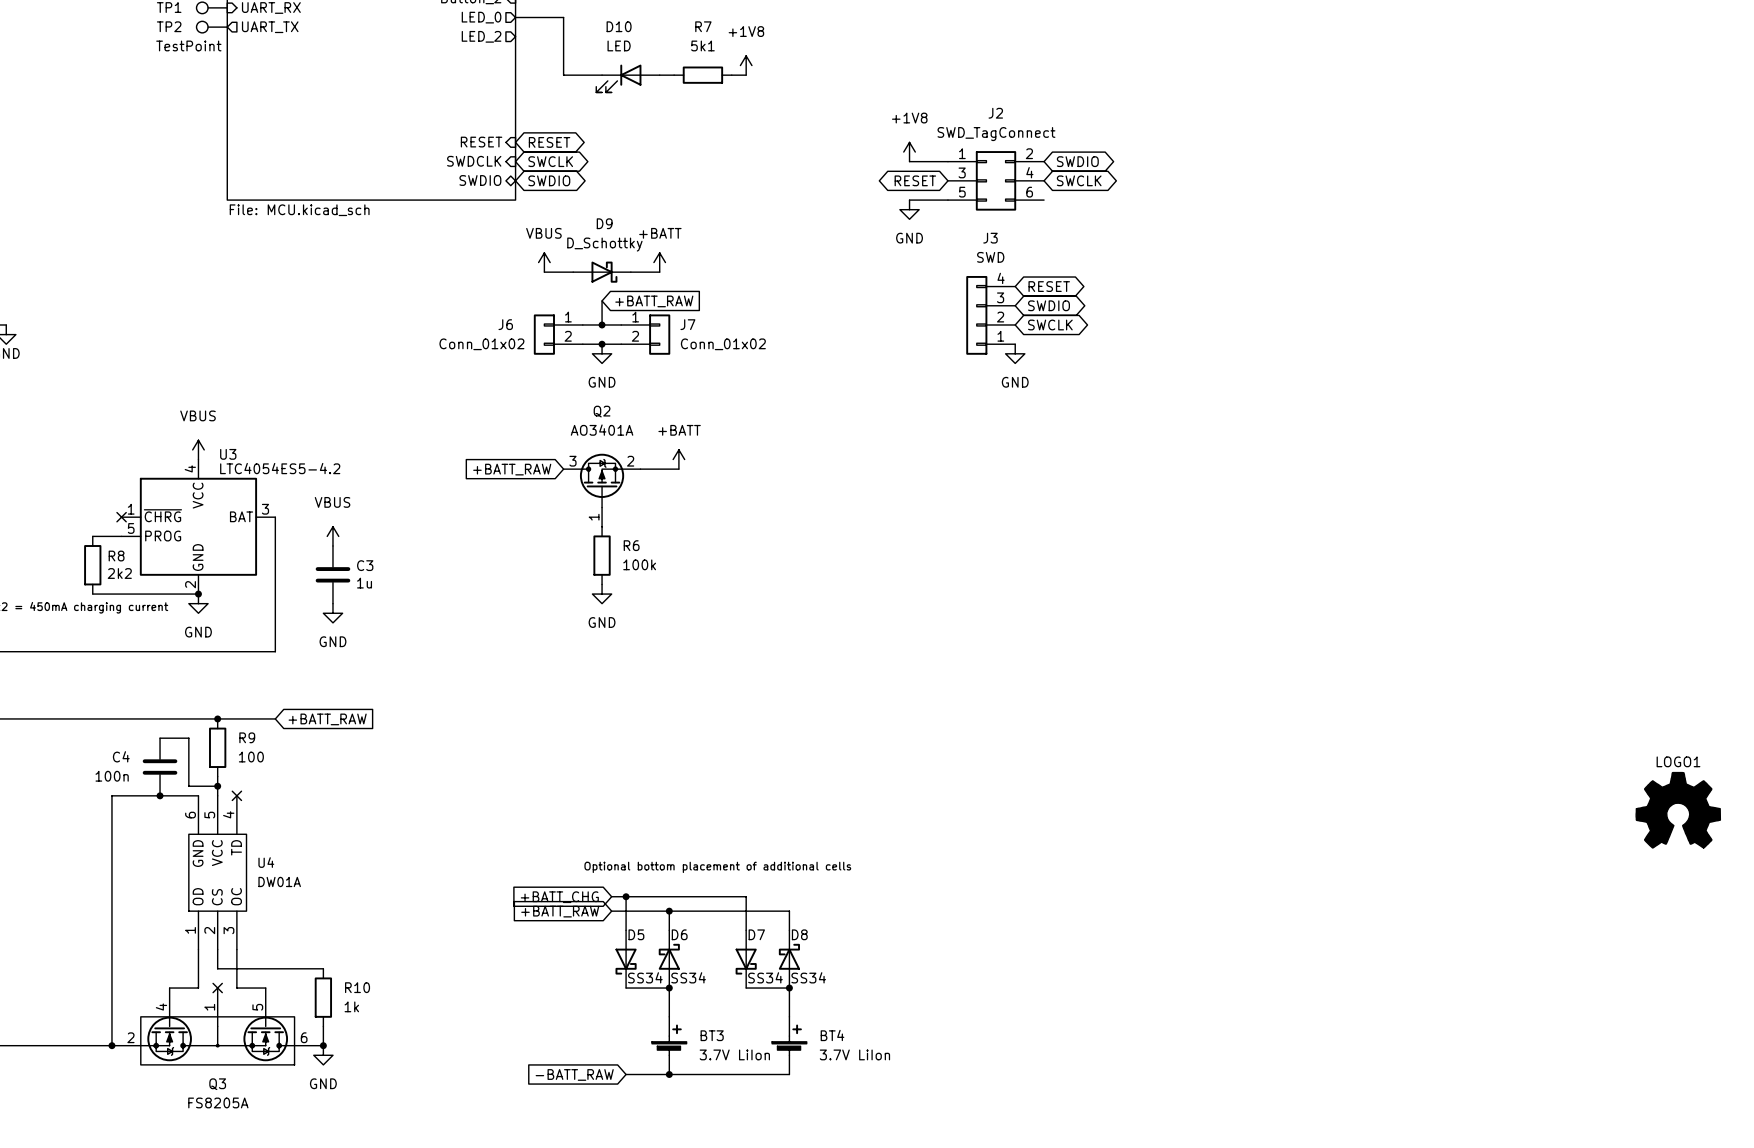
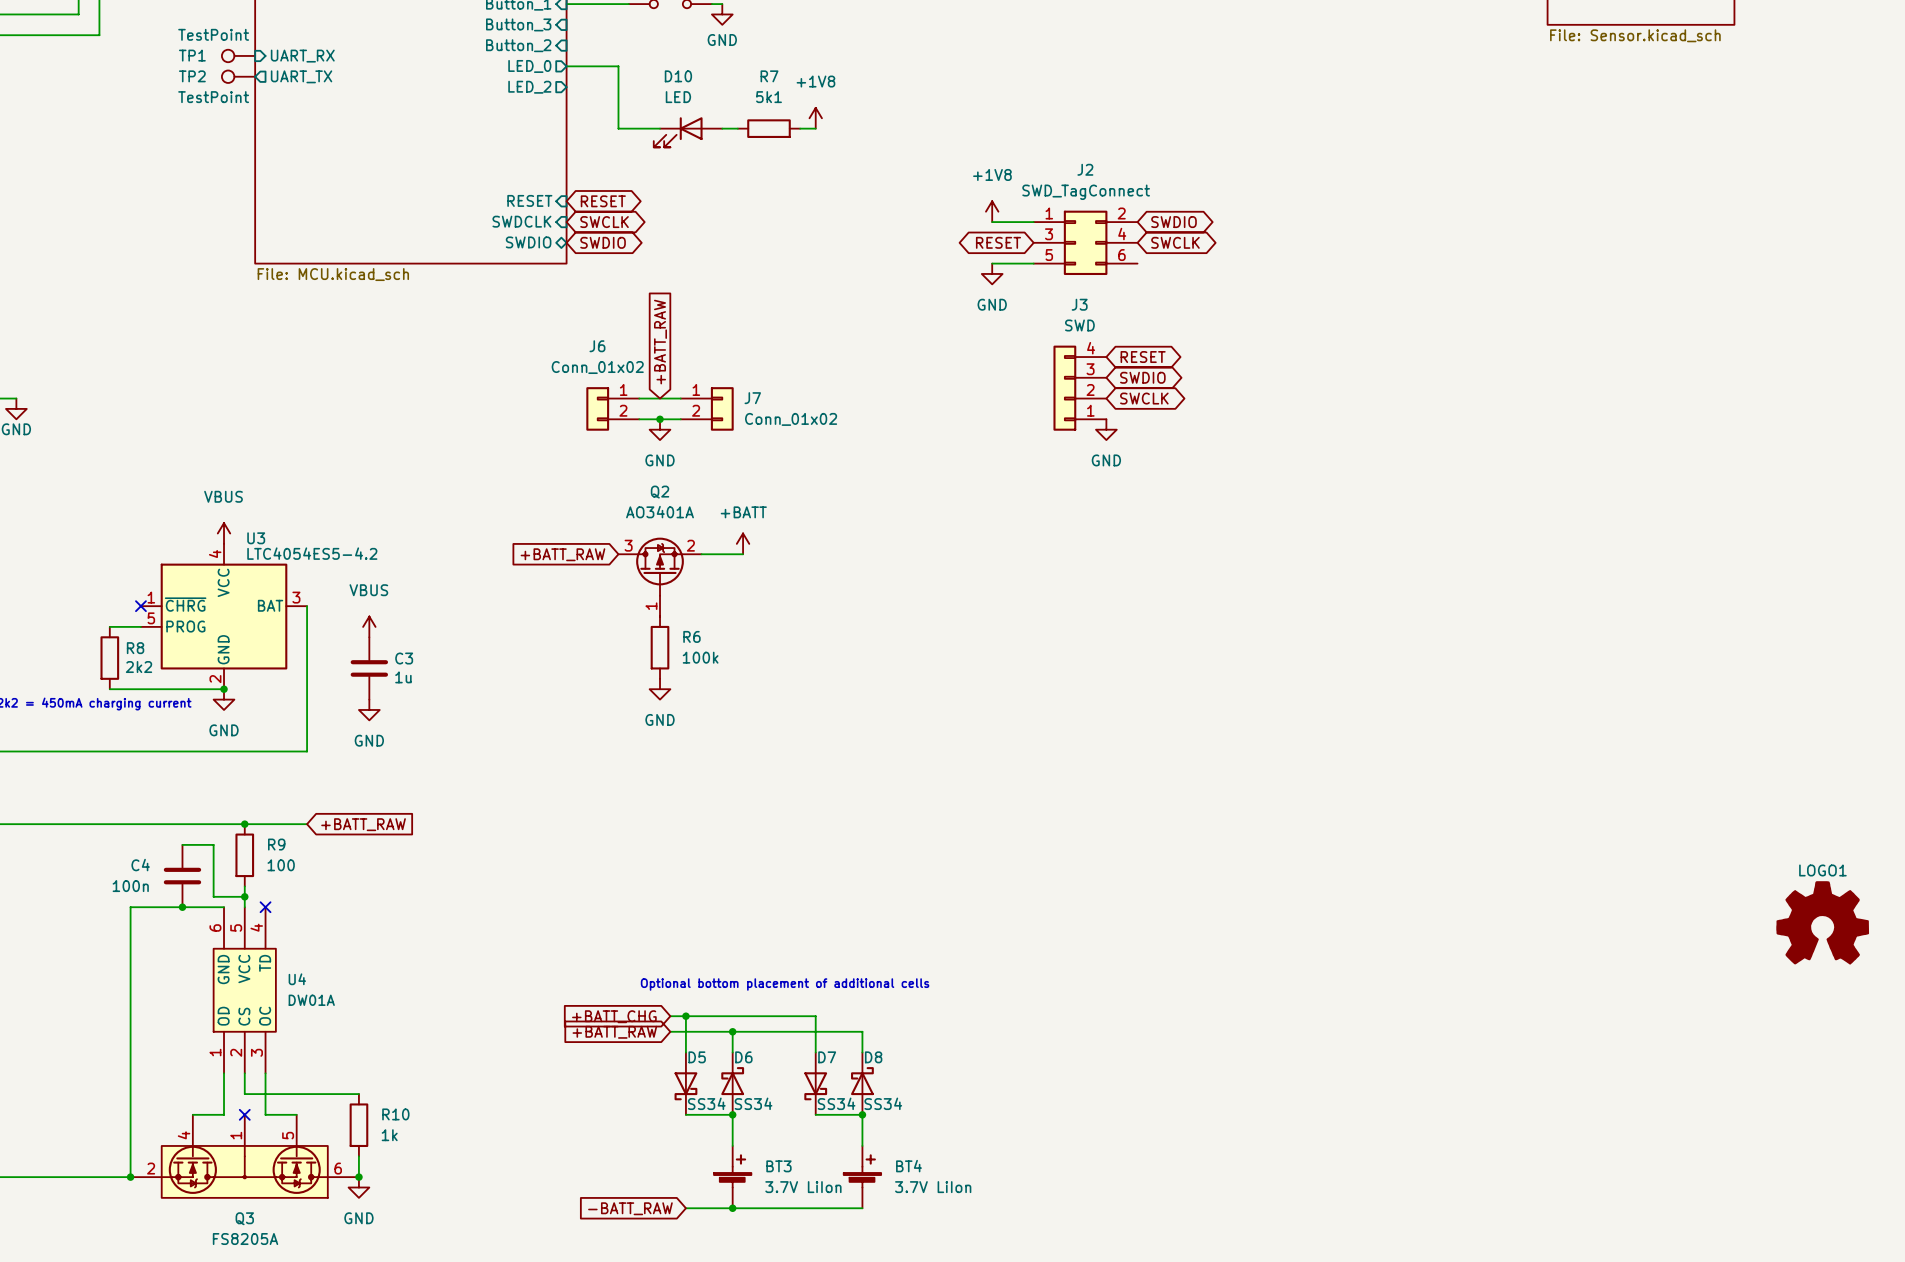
power symbol: VBUS (544, 262) -> none
power symbol: +BATT (659, 262) -> none
wire: (544, 272) (573, 272) -> none
D9: D_Schottky (602, 272) -> none
wire: (630, 272) (659, 272) -> none
wire: (602, 300) (602, 324) -> none
global label rotation: 0° (654, 301) -> 90° counterclockwise (660, 342)
J6 name position: J6 (505, 324) -> J6 (597, 346)
junction: (602, 324) -> none
J6 value position: Conn_01x02 (481, 344) -> Conn_01x02 (597, 367)

